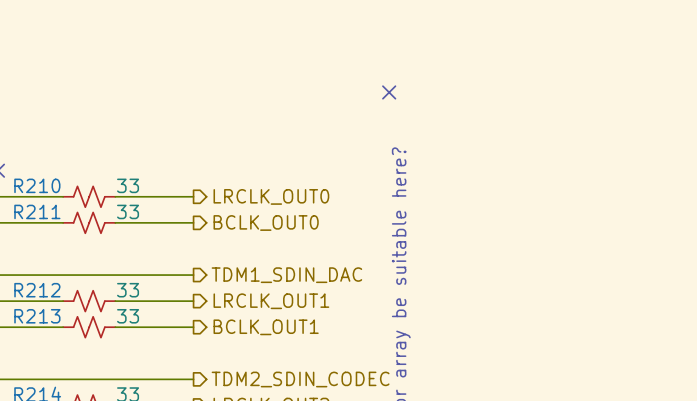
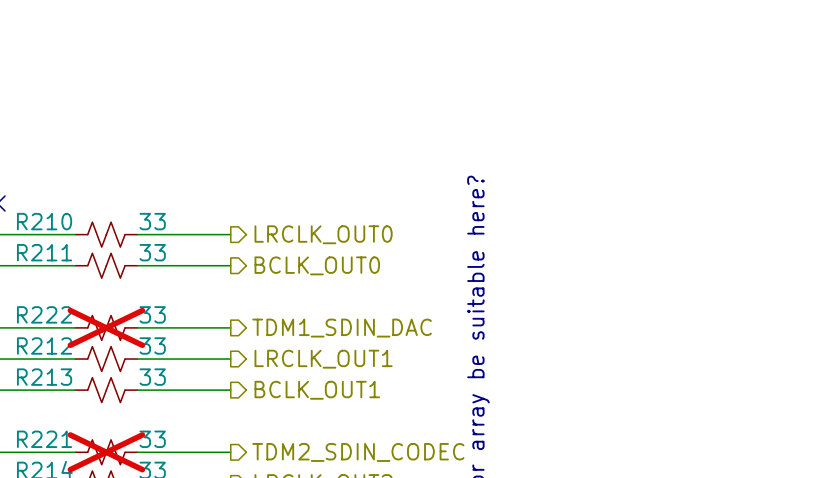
no-connect mark: (389, 92) -> none
R222: none -> 33 (106, 327)
R221: none -> 33 (106, 452)

